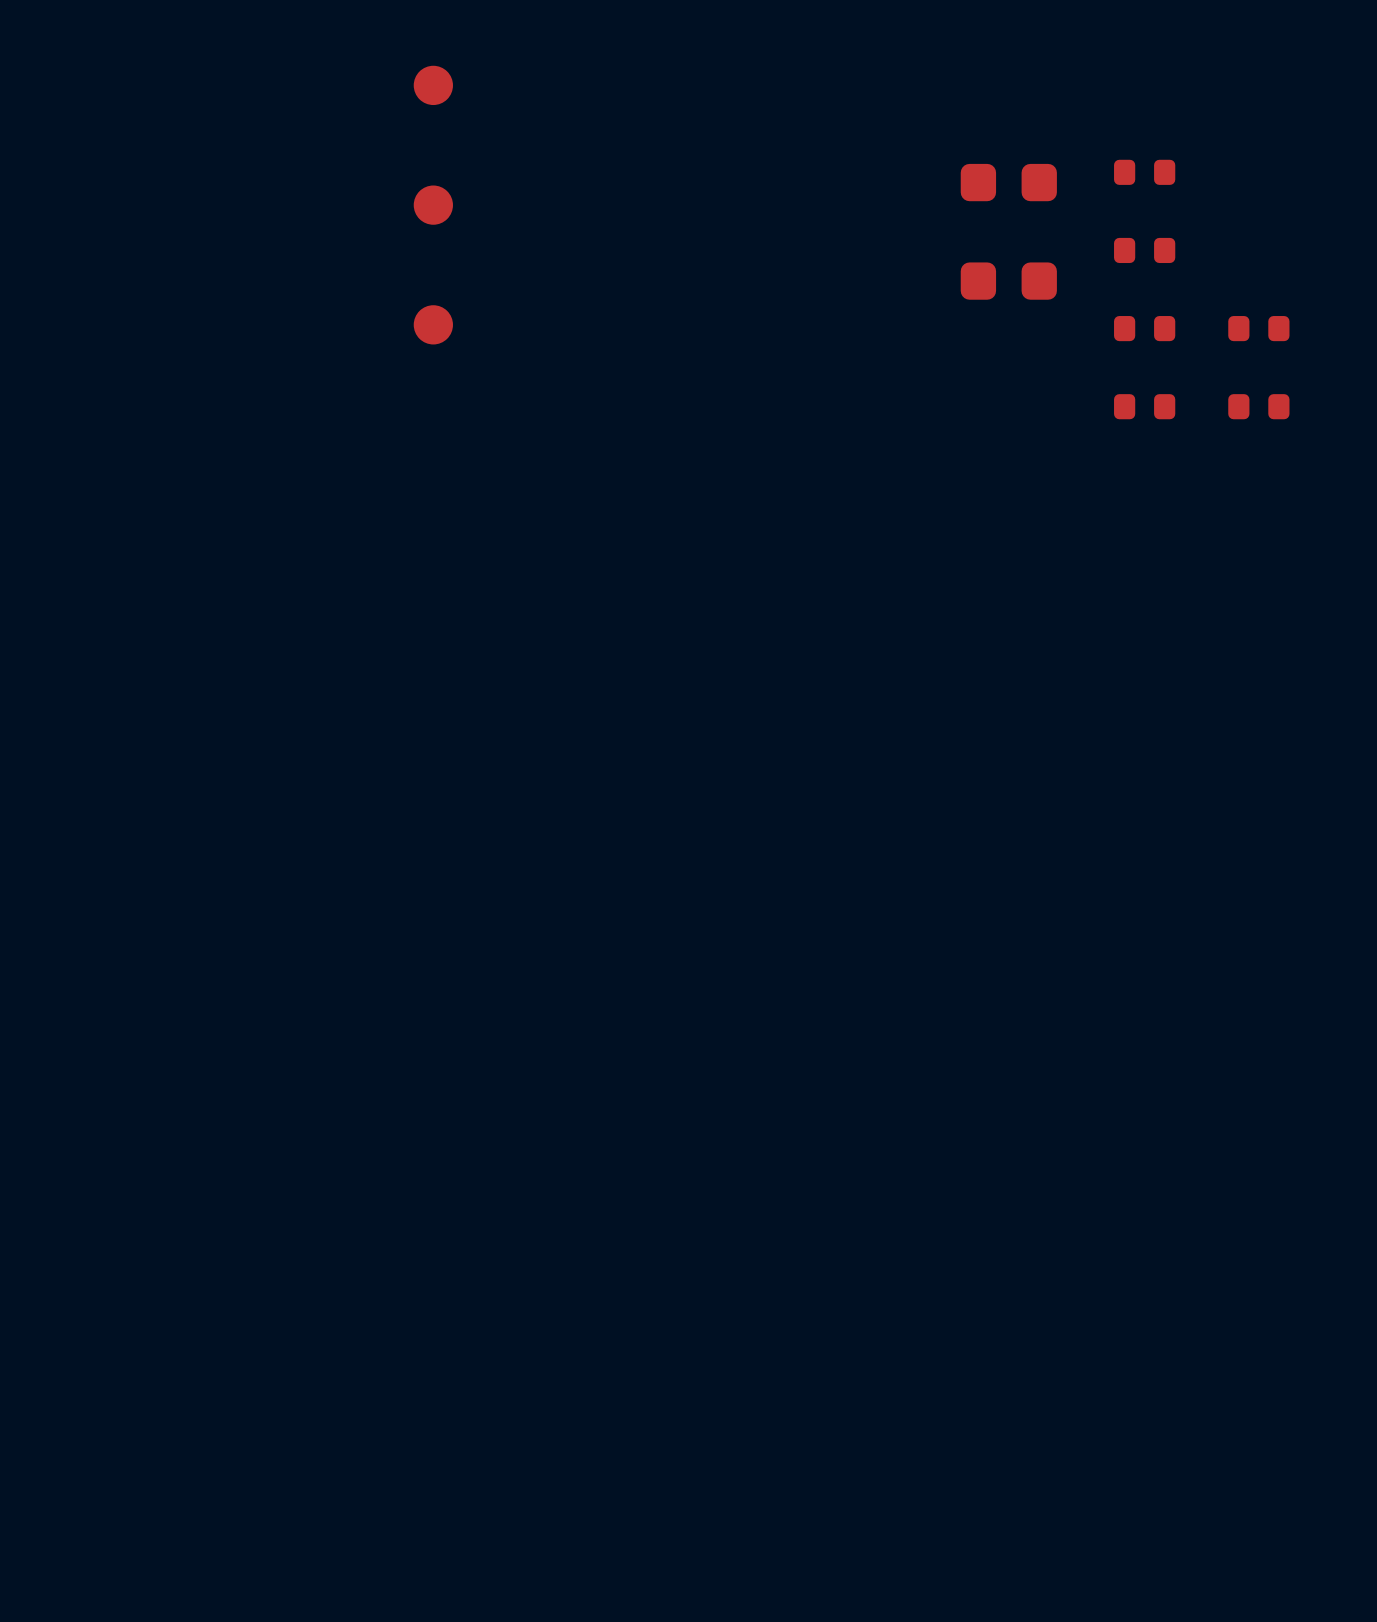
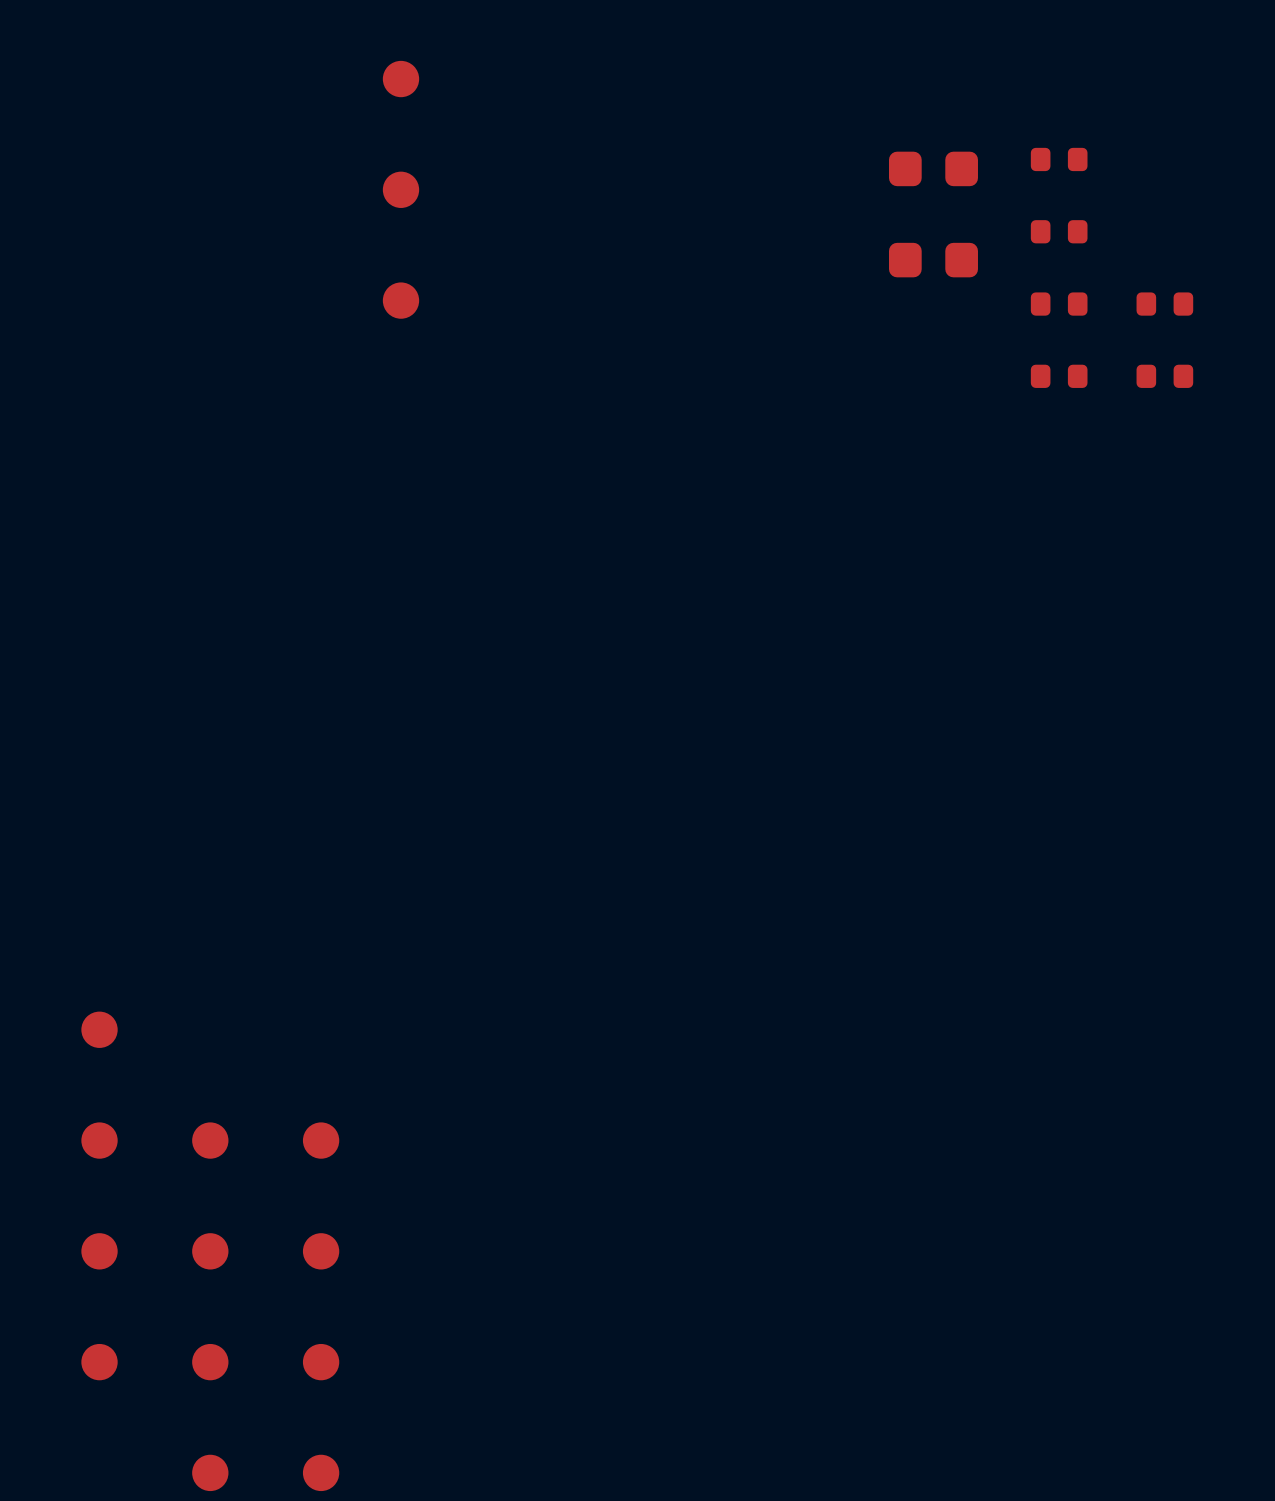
part: none -> (99, 1029)
part: none -> (99, 1140)
part: none -> (210, 1140)
part: none -> (321, 1140)
part: none -> (99, 1251)
part: none -> (210, 1251)
part: none -> (321, 1251)
part: none -> (99, 1362)
part: none -> (210, 1362)
part: none -> (321, 1362)
part: none -> (210, 1472)
part: none -> (321, 1472)

